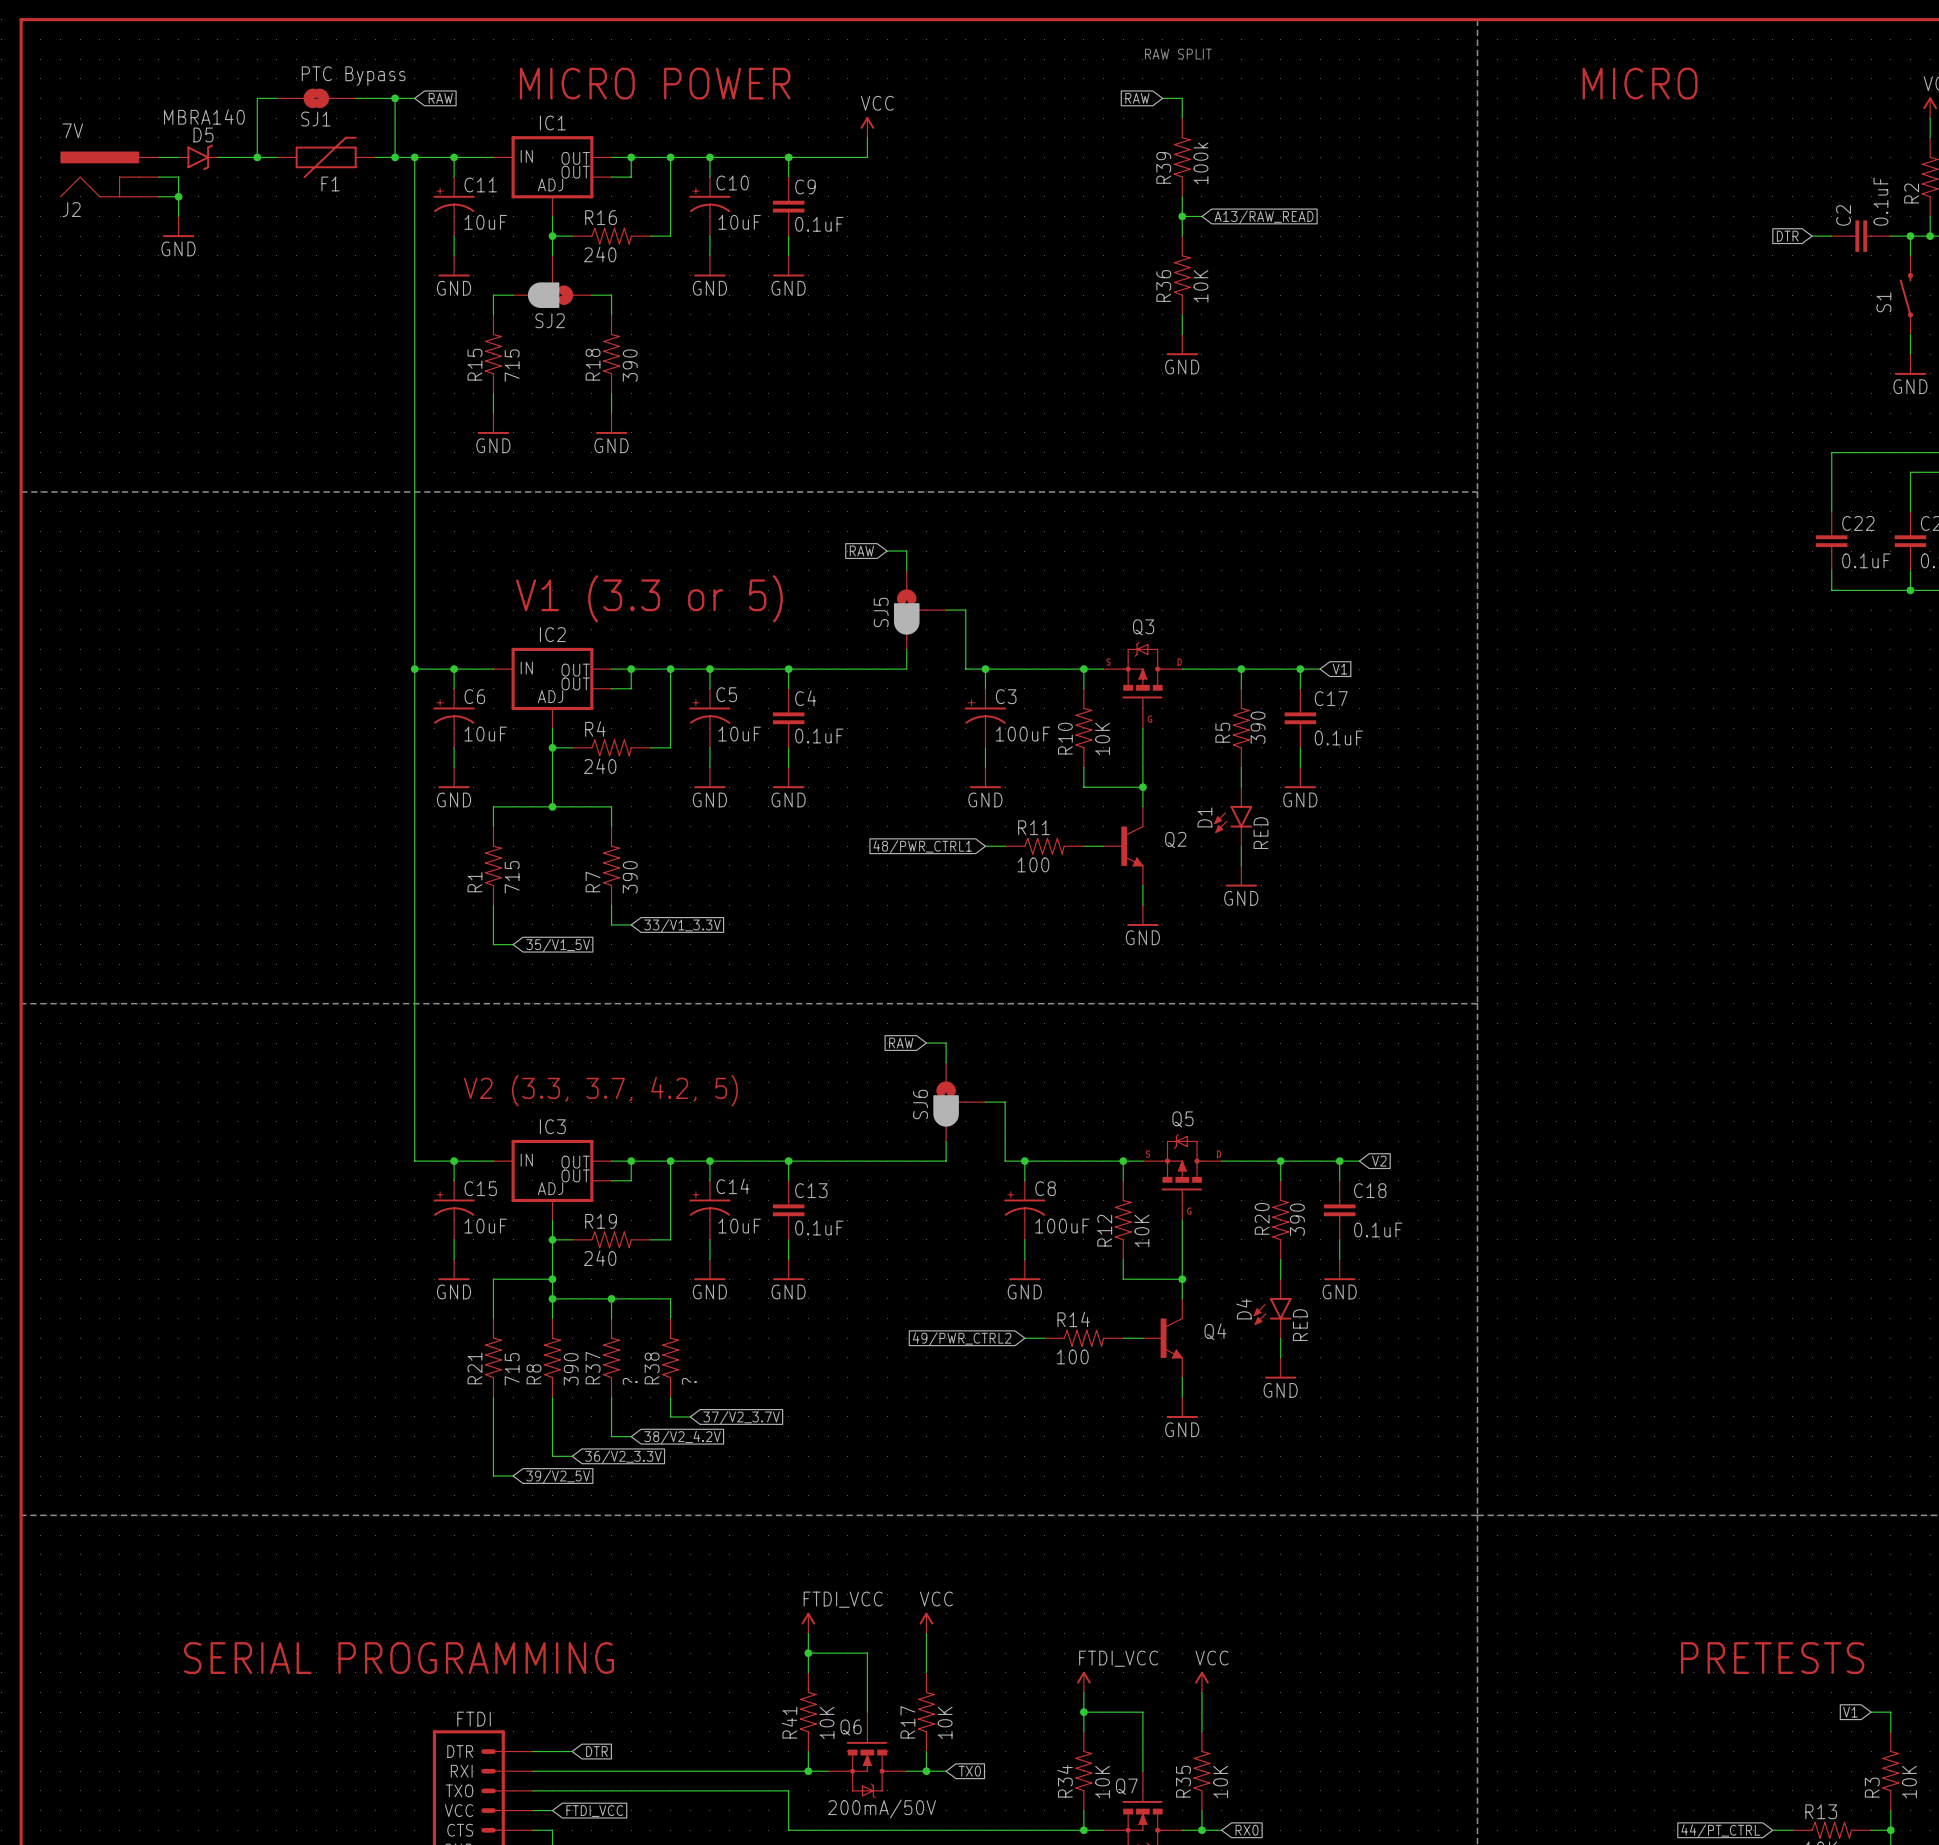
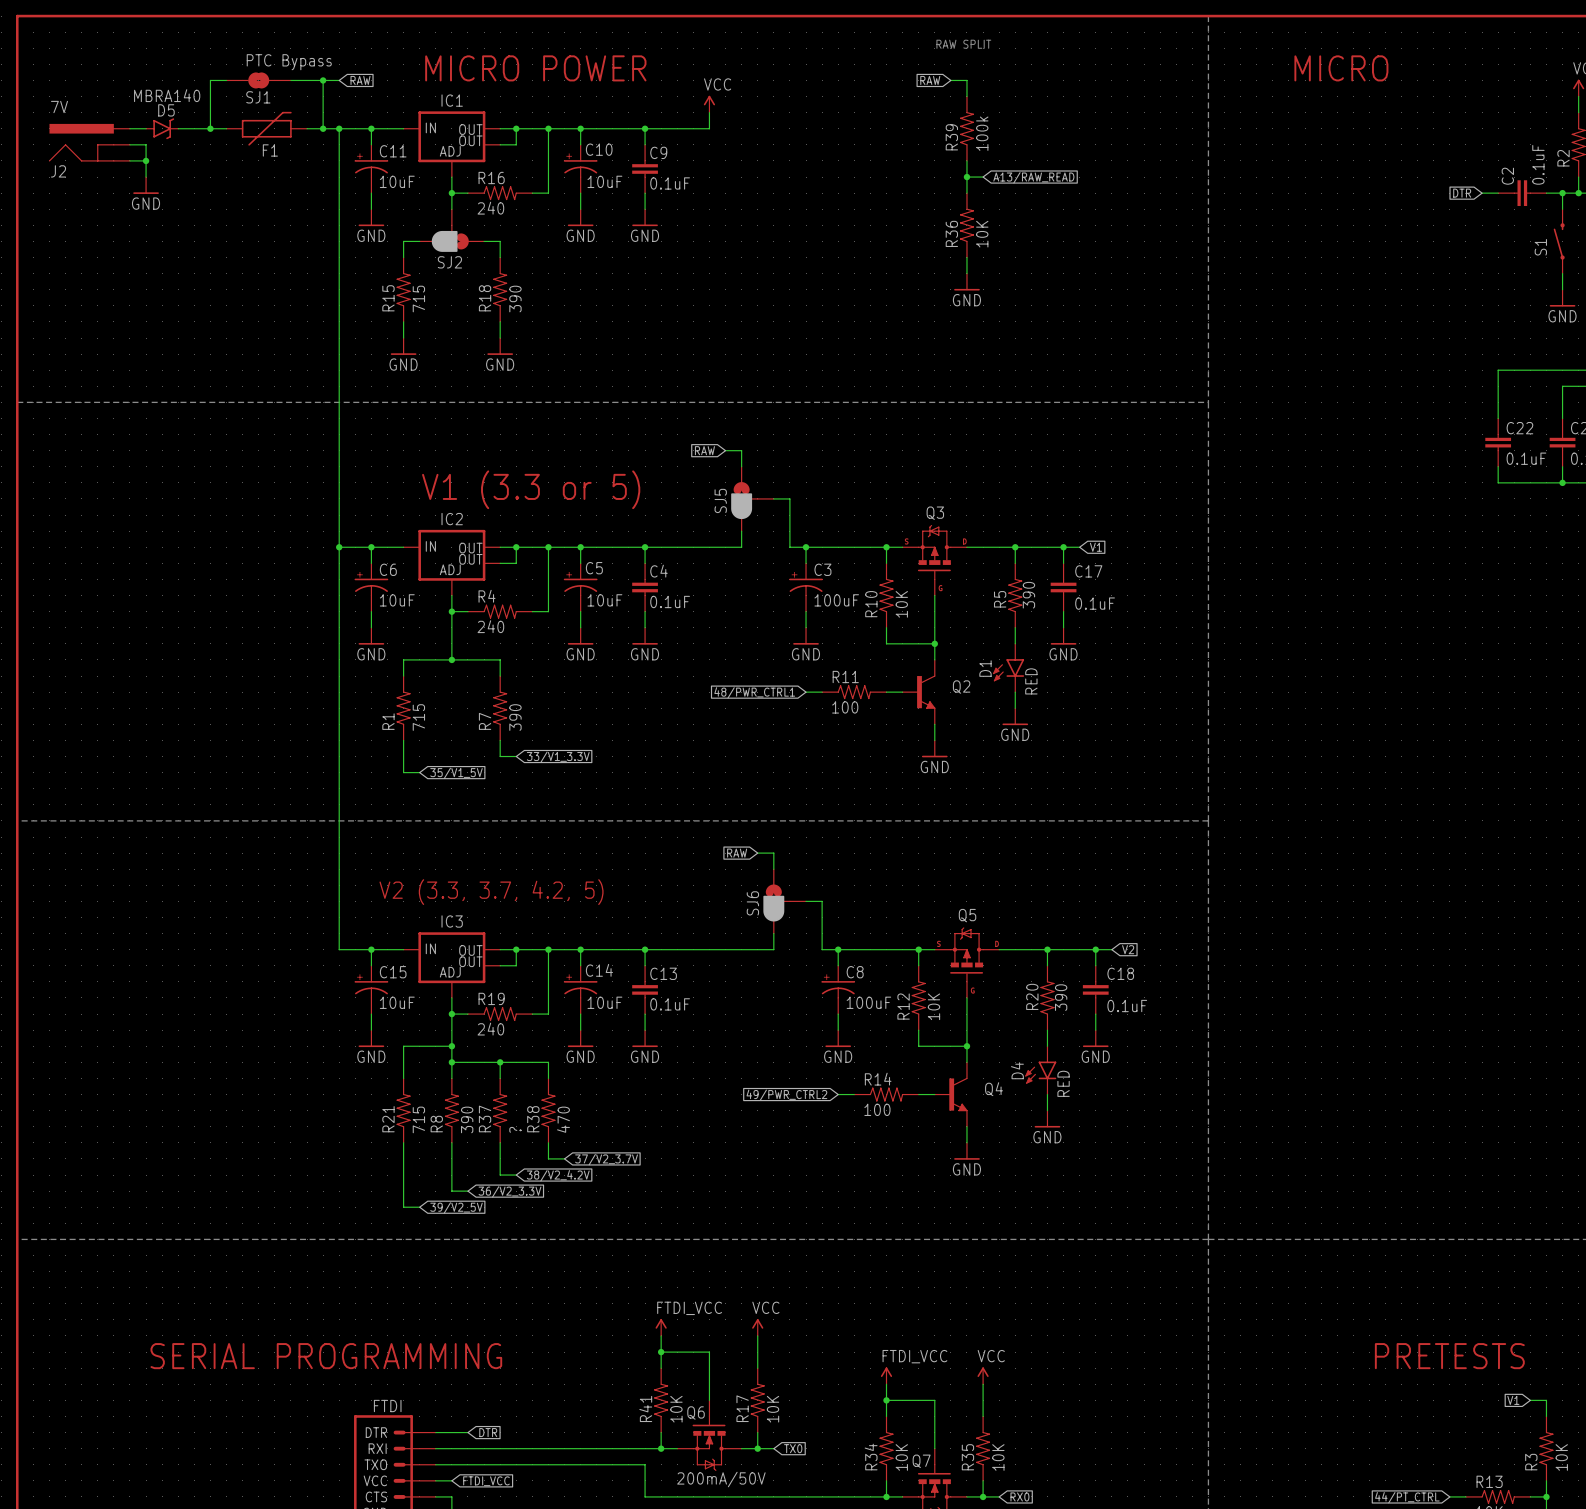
R38 value: ? (689, 1381) -> 470 (563, 1119)

